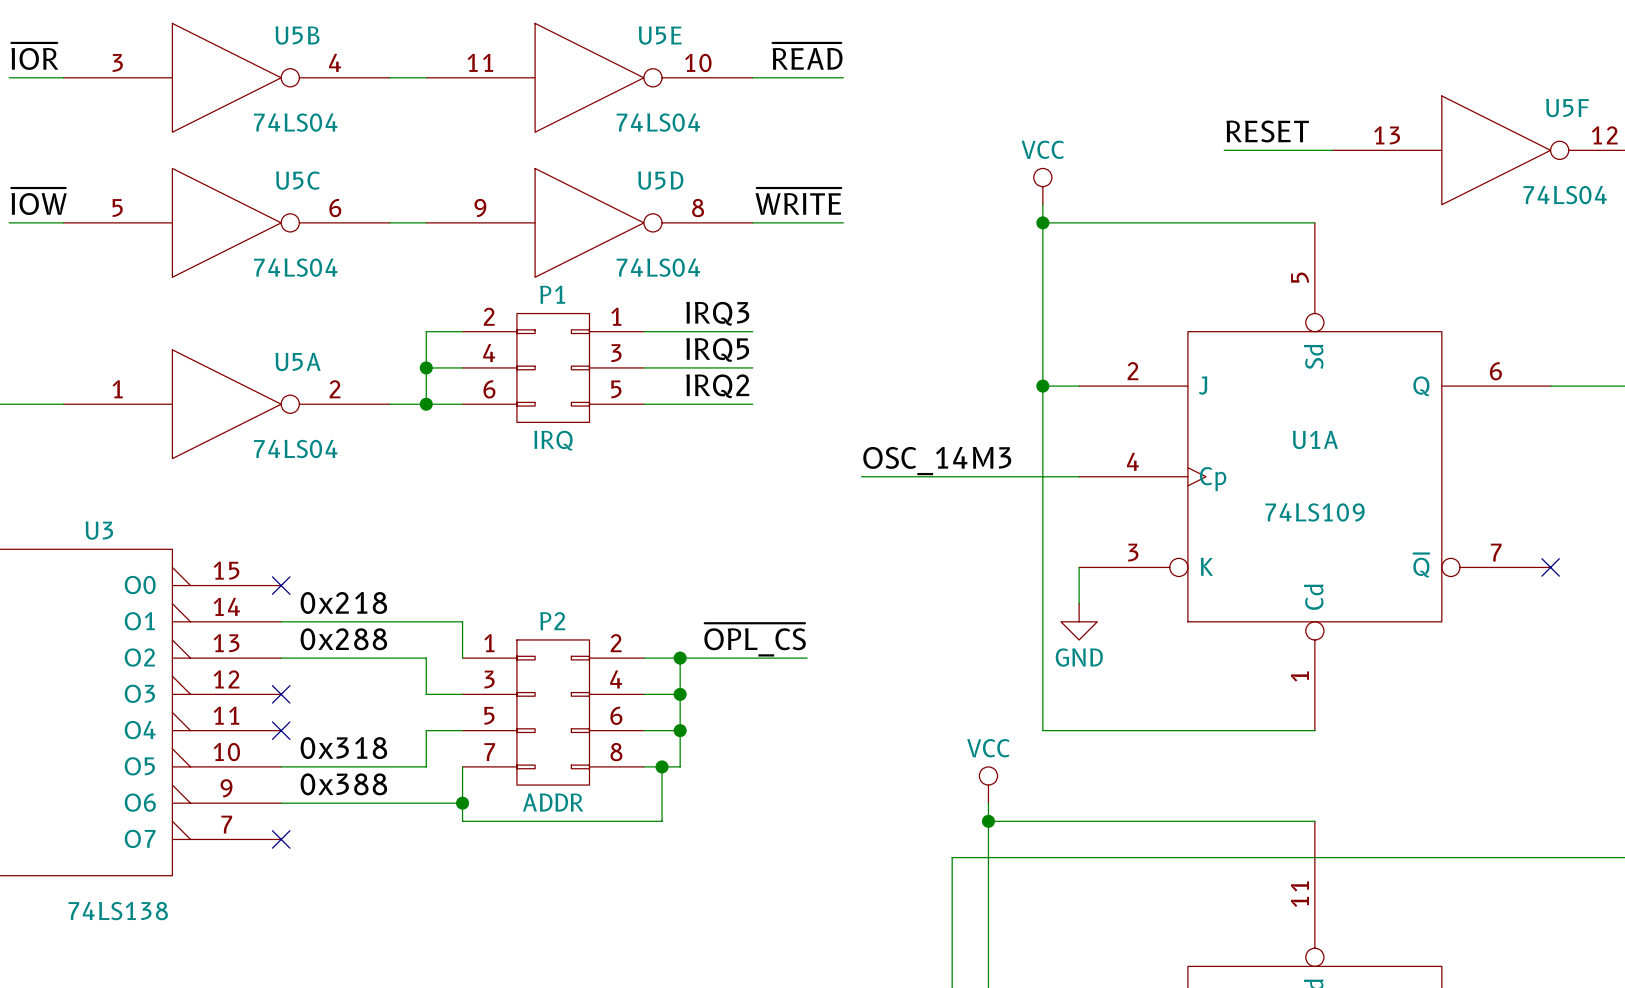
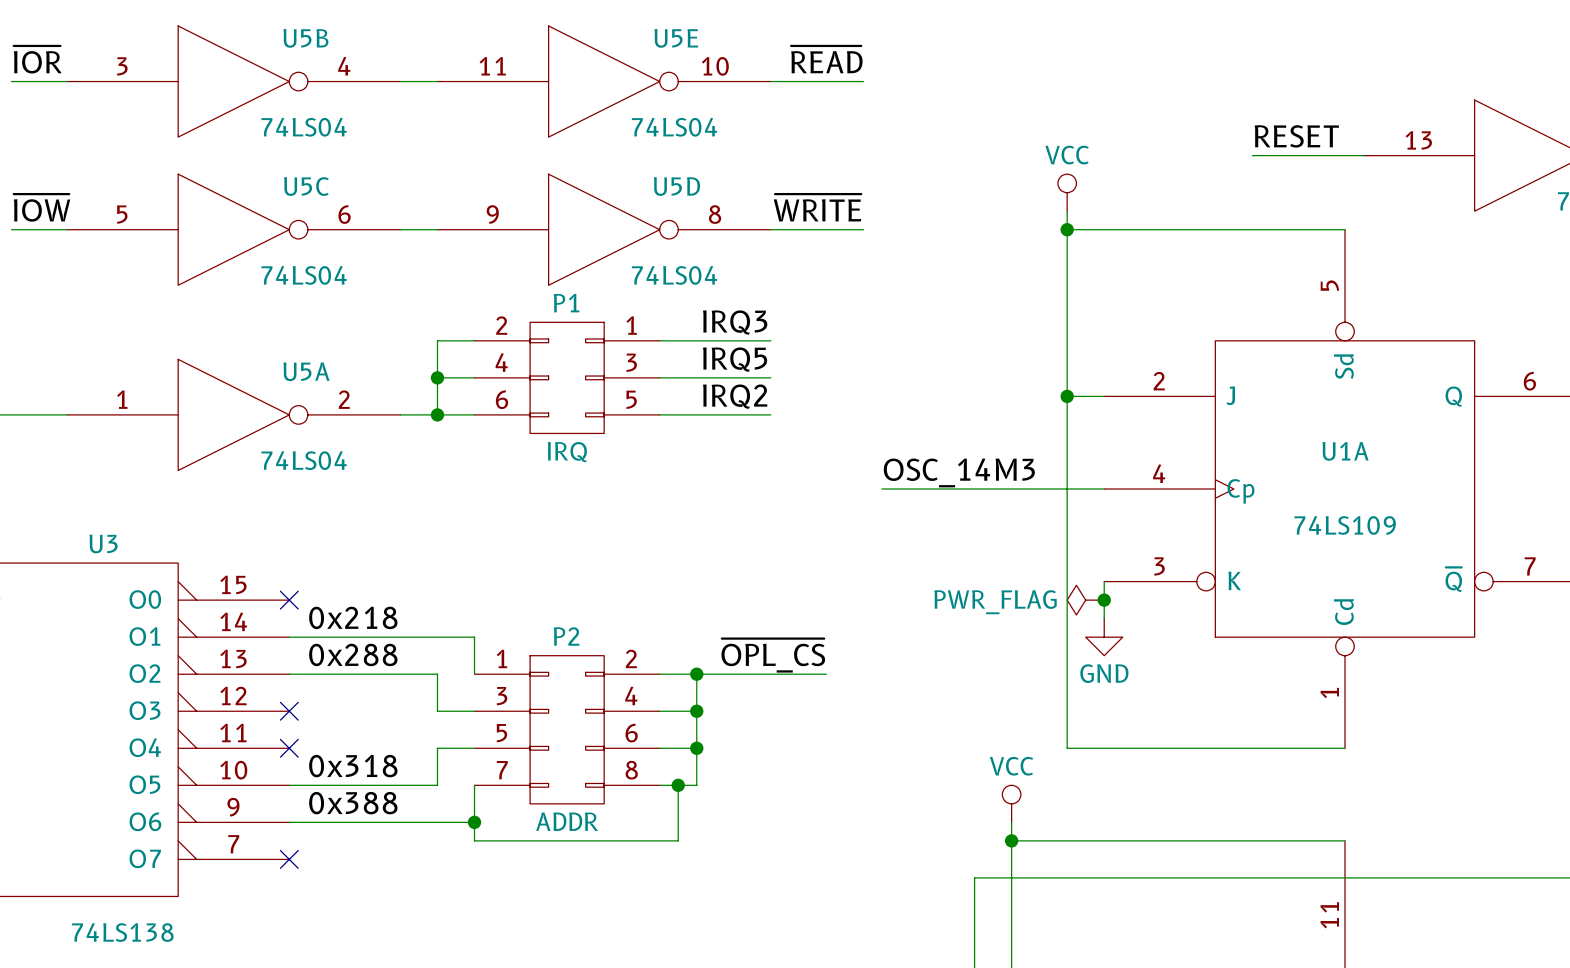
power symbol: none -> PWR_FLAG (1085, 600)
junction: none -> (1104, 600)

